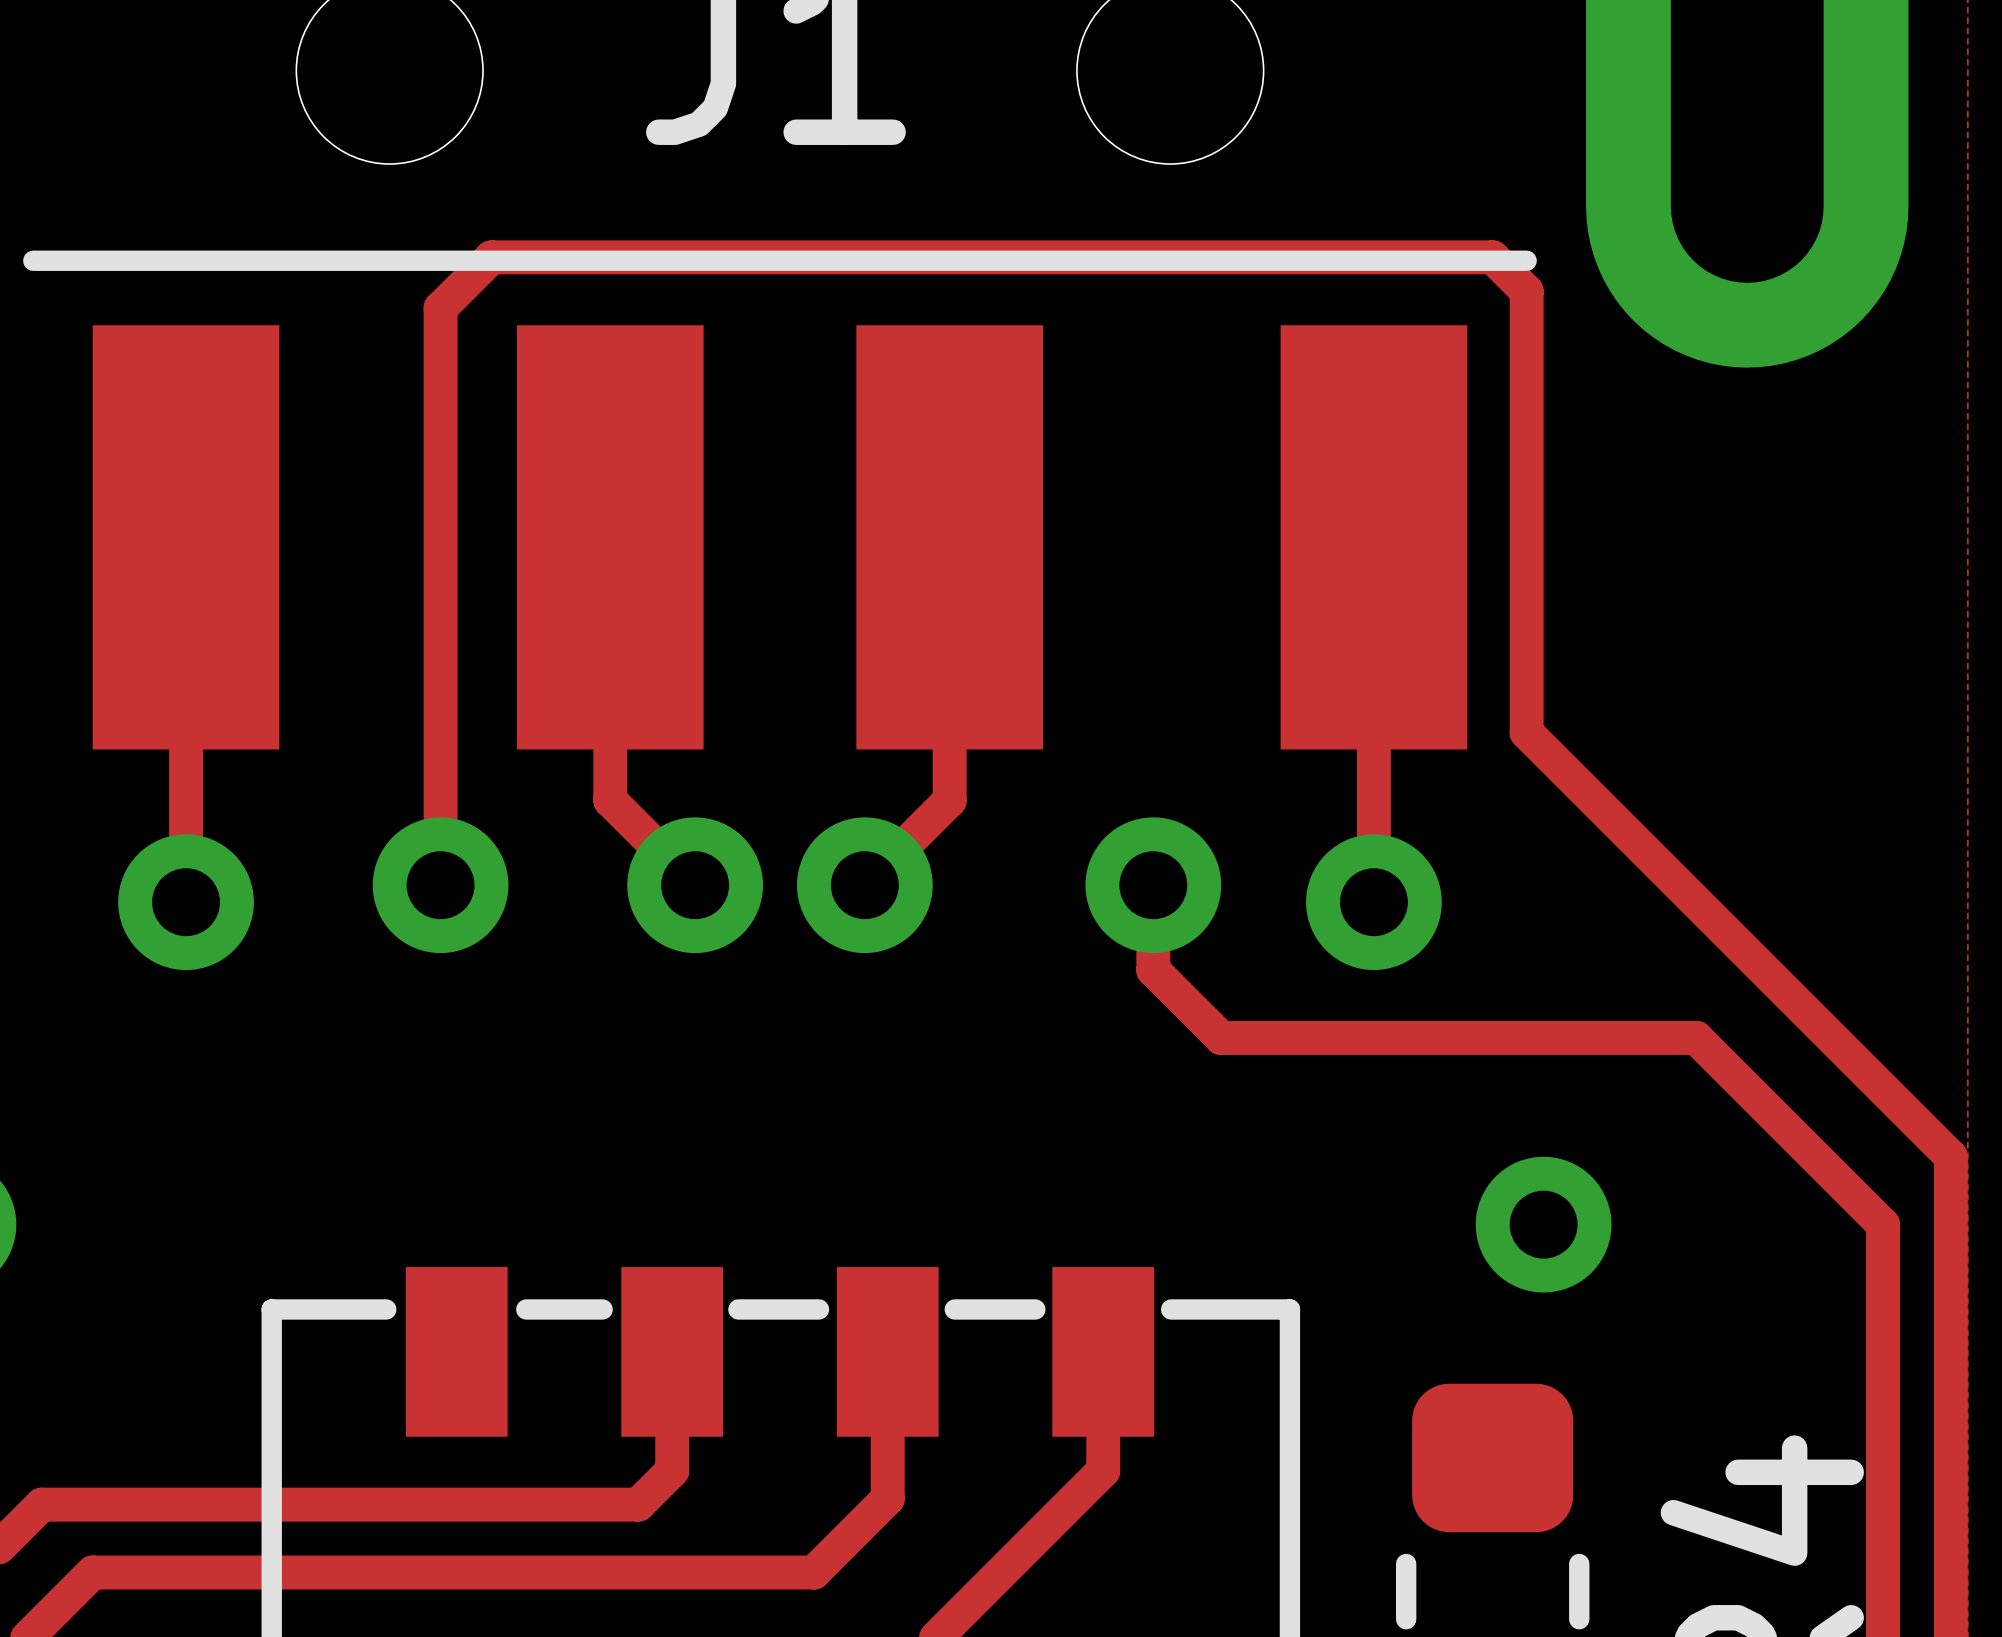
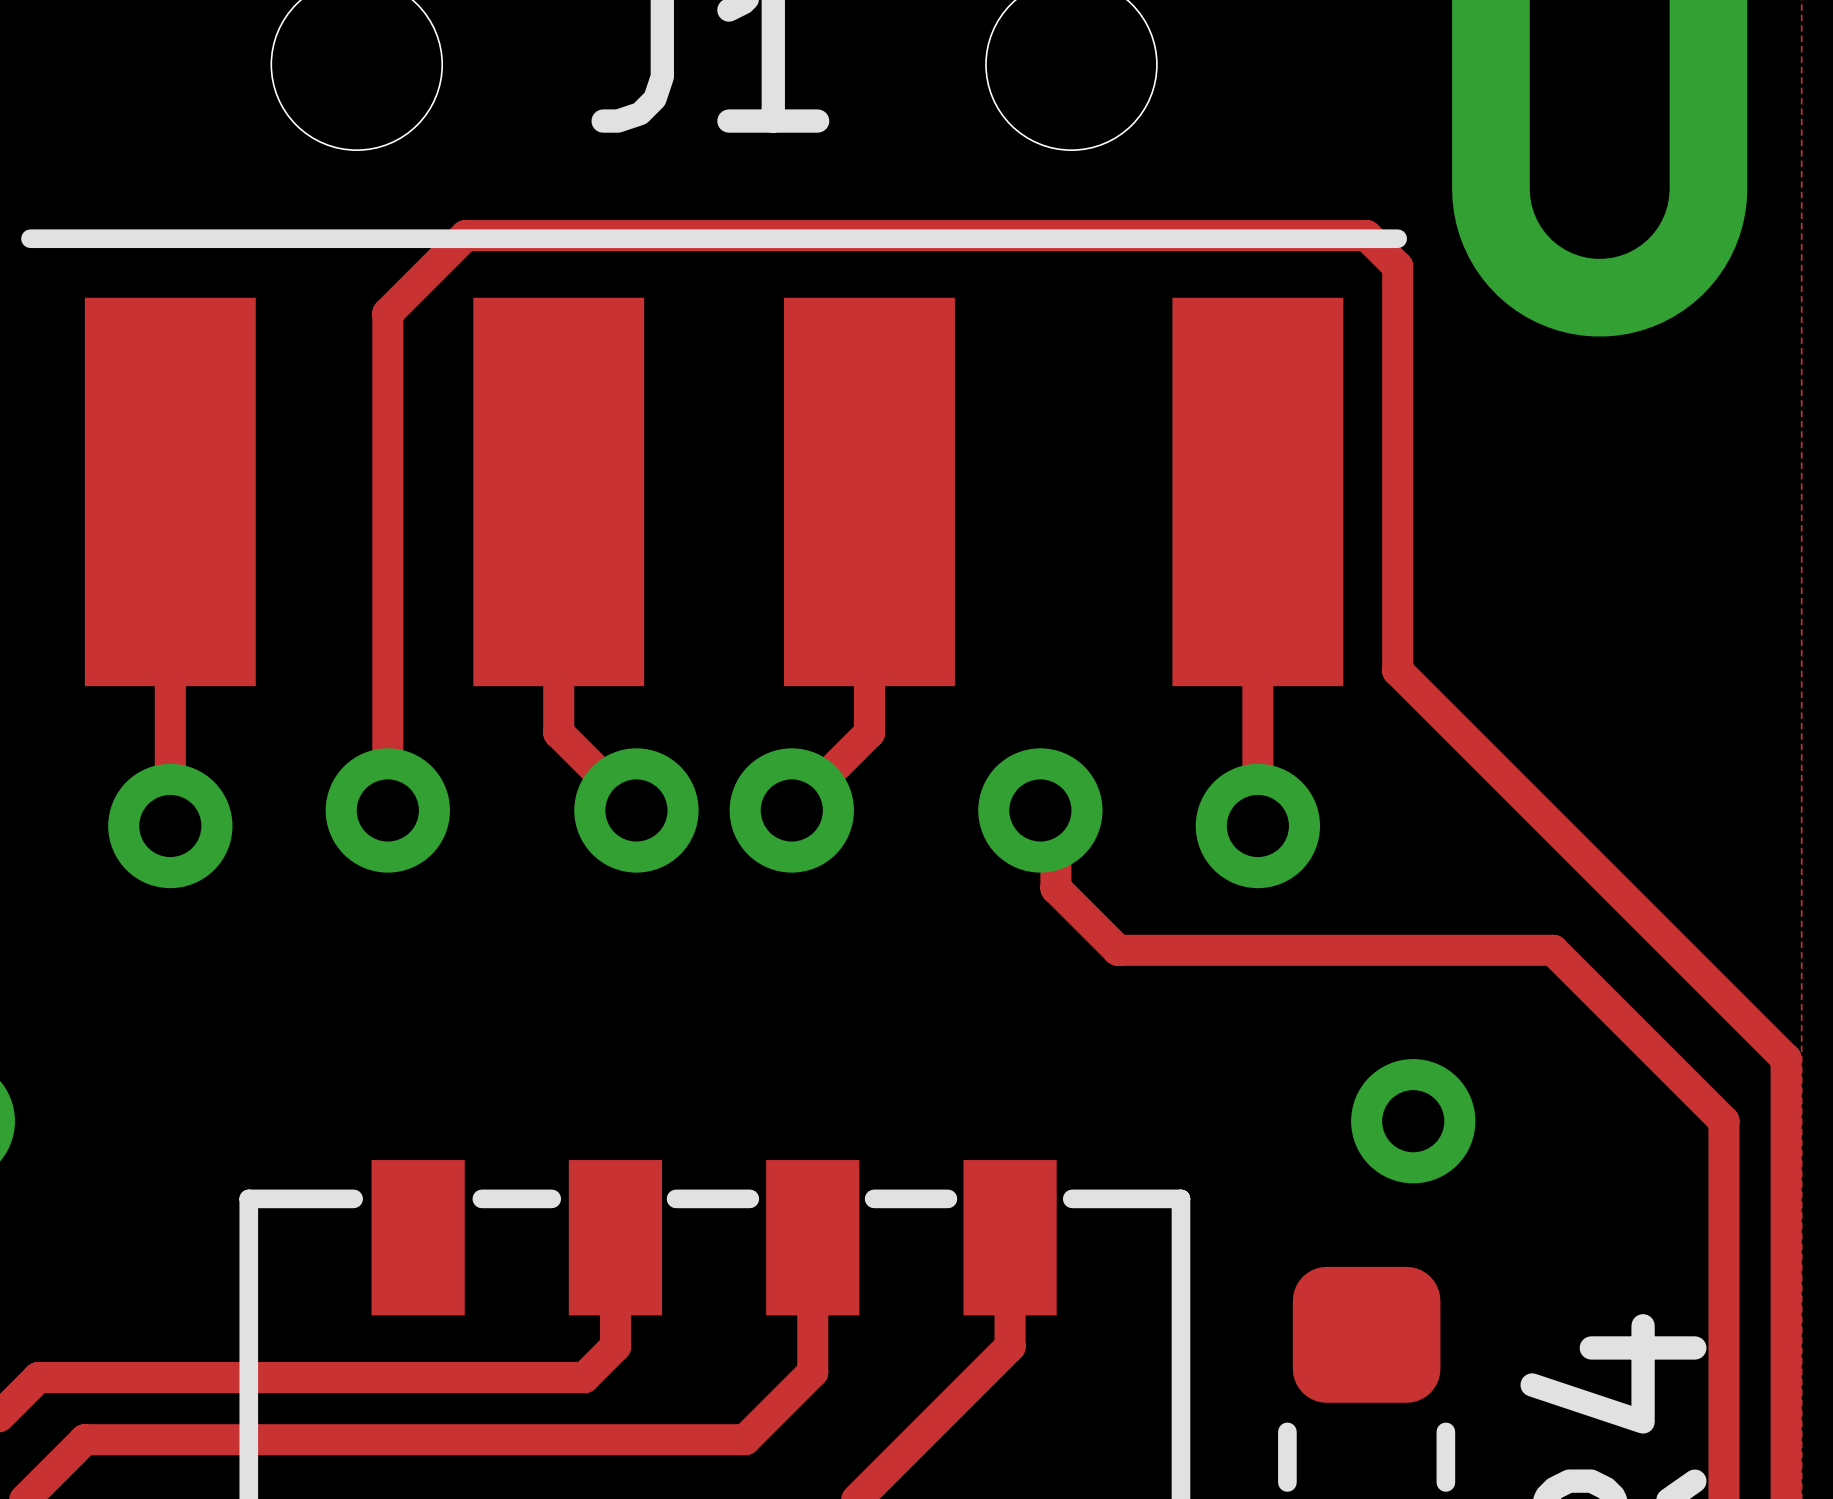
track: (508, 257) (491, 257) (440, 308) (440, 885) -> (465, 235) (387, 313) (387, 810)
via position: (440, 885) -> (387, 810)
via position: (1153, 885) -> (1040, 810)

